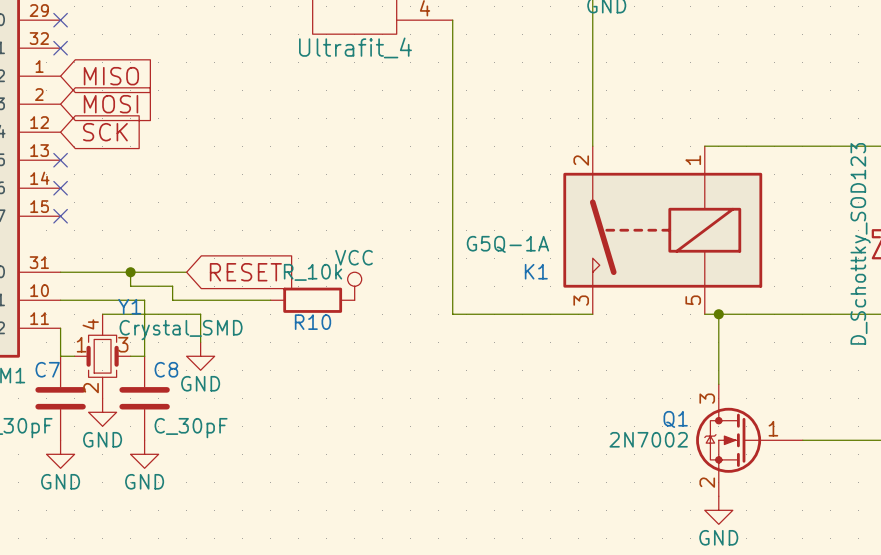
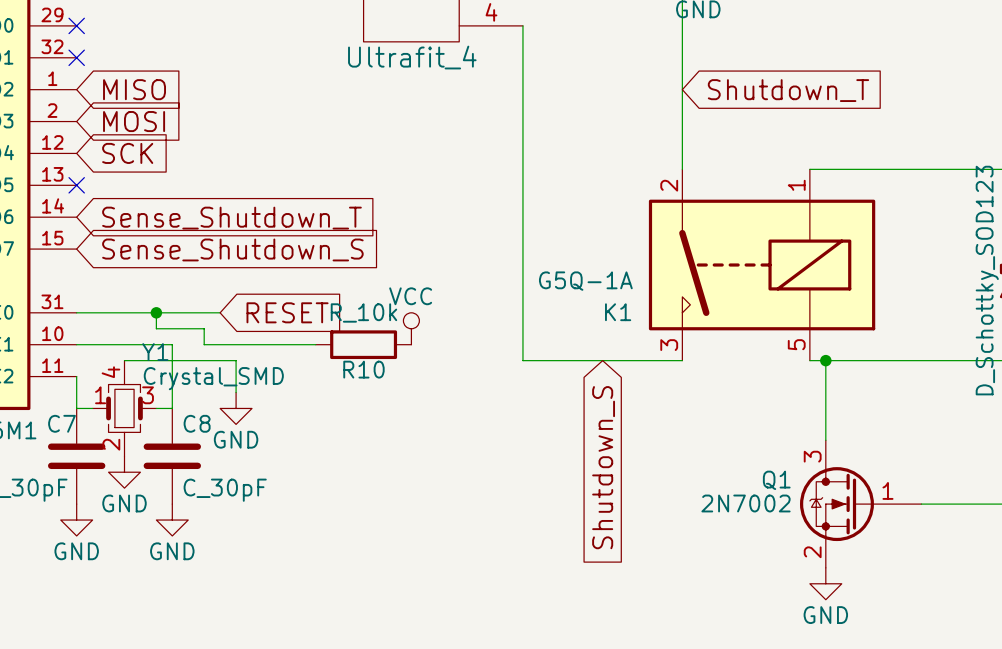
global label: none -> Shutdown_T (788, 90)
no-connect mark: (60, 188) -> none
global label: none -> Sense_Shutdown_T (231, 218)
no-connect mark: (60, 216) -> none
global label: none -> Sense_Shutdown_S (232, 249)
global label: none -> Shutdown_S (603, 467)

